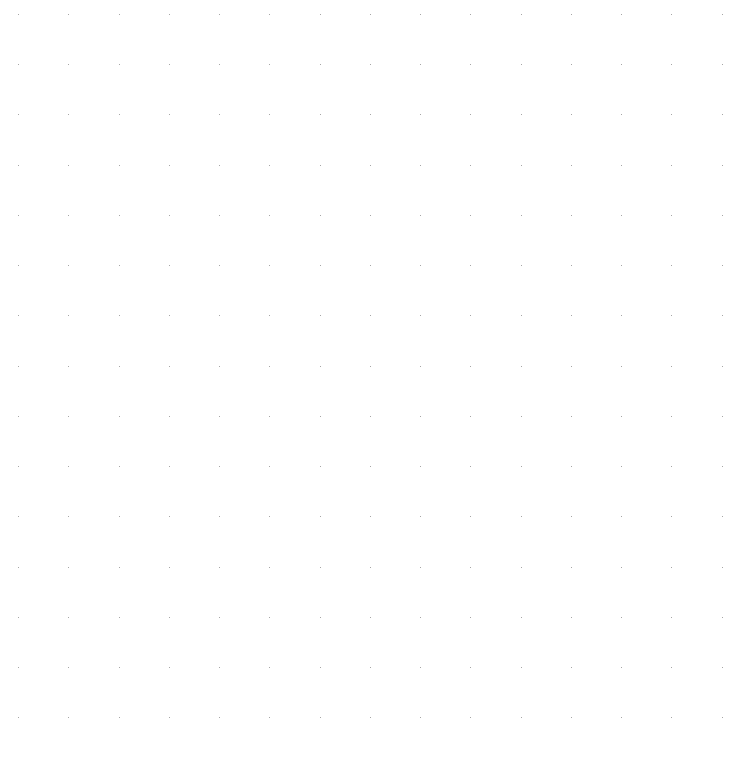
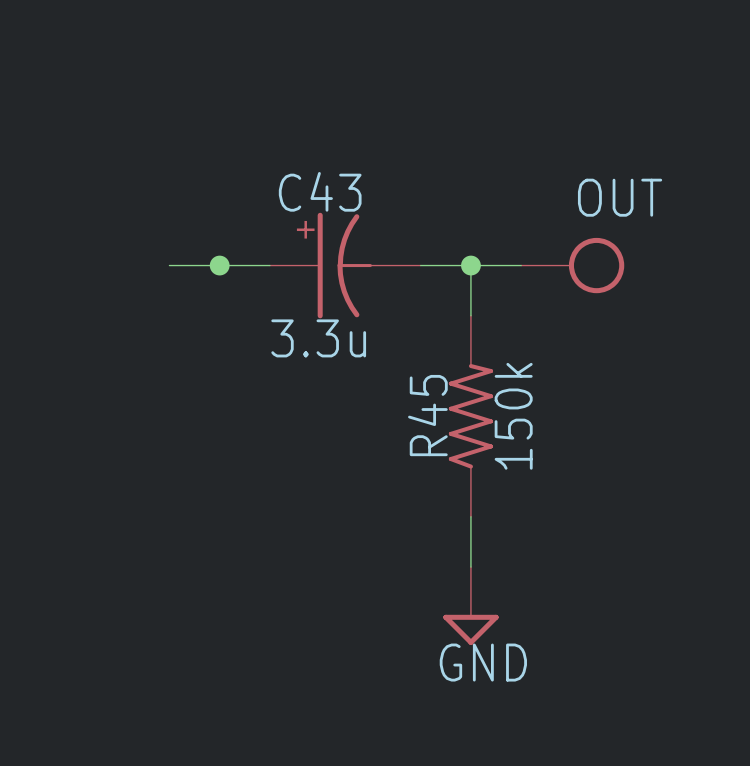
wire: none -> (169, 265) (269, 265)
junction: none -> (219, 265)
C43: none -> 3.3u (345, 265)
wire: none -> (420, 265) (521, 265)
wire: none -> (470, 265) (470, 315)
junction: none -> (470, 265)
OUT: none -> (572, 265)
R45: none -> 150k (470, 416)
wire: none -> (470, 516) (470, 567)
power symbol: none -> GND (470, 606)

